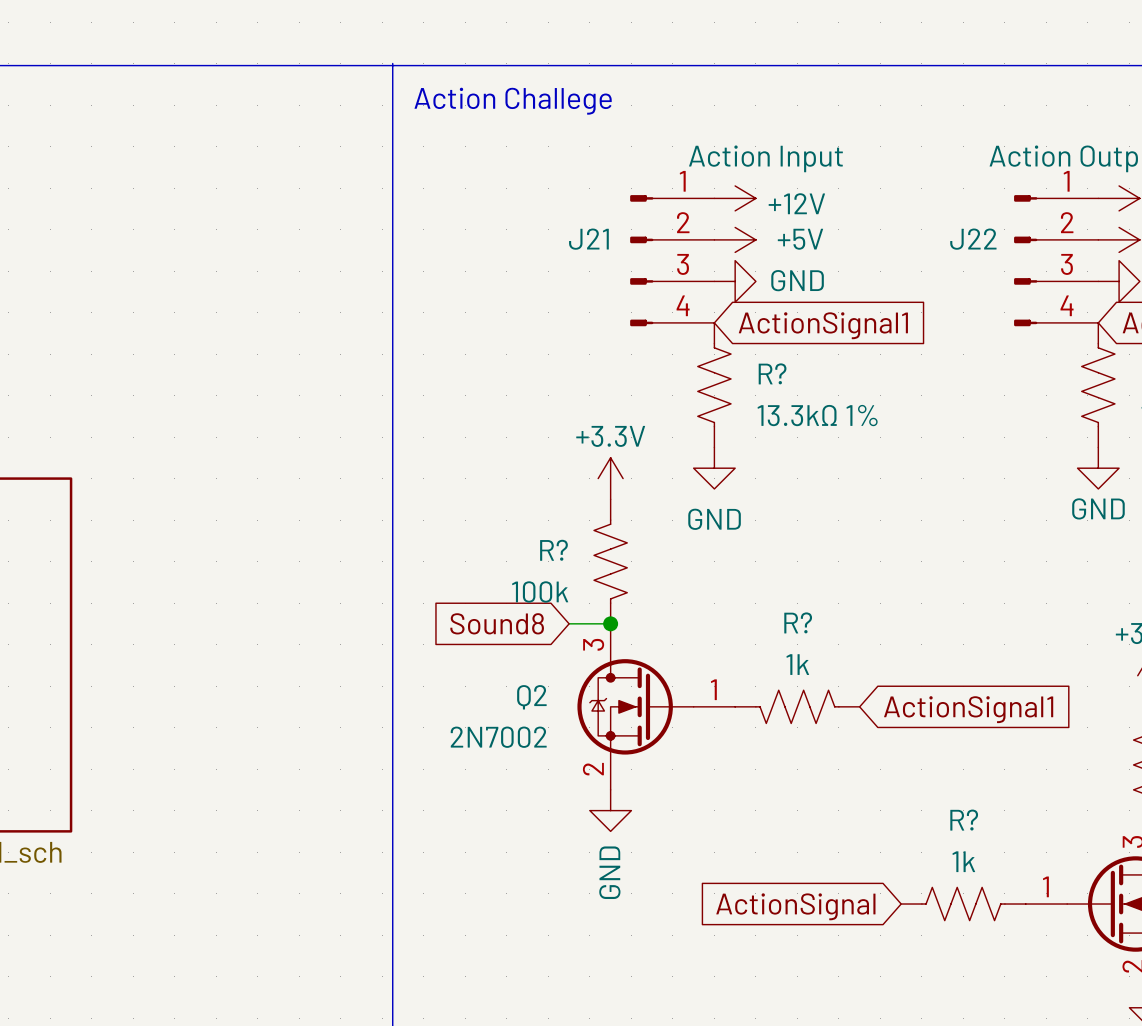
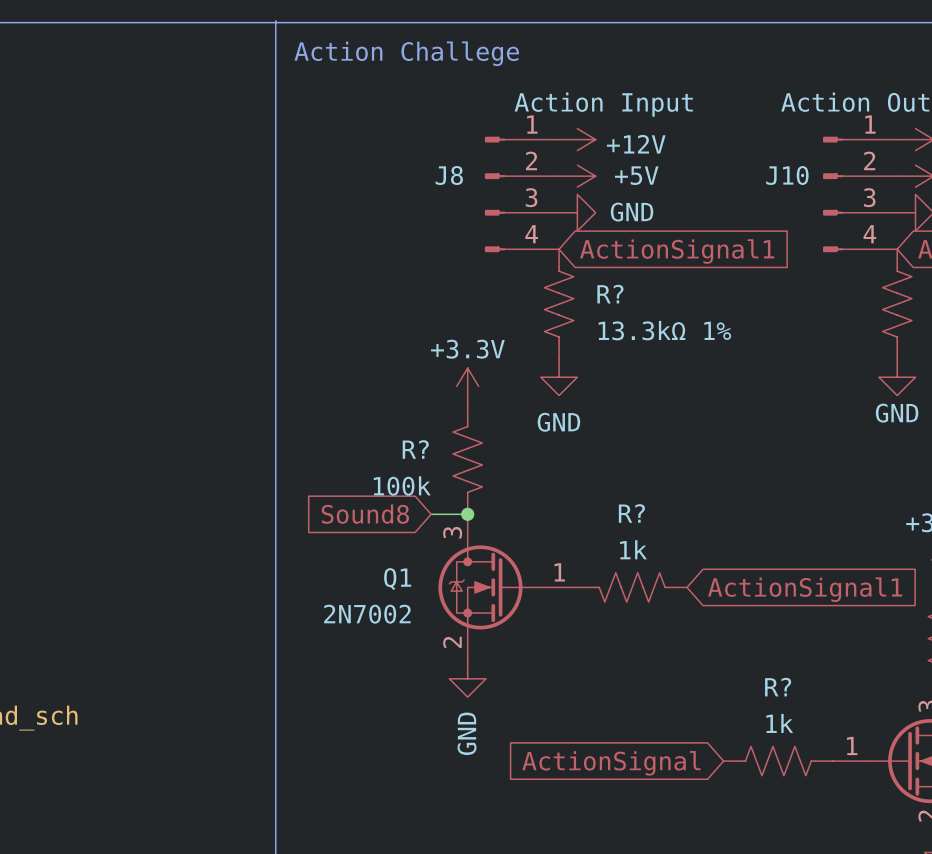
J21 name: J21 (588, 239) -> J8 (449, 175)
J22 name: J22 (973, 239) -> J10 (787, 175)
Q2 name: Q2 (531, 697) -> Q1 (397, 579)

